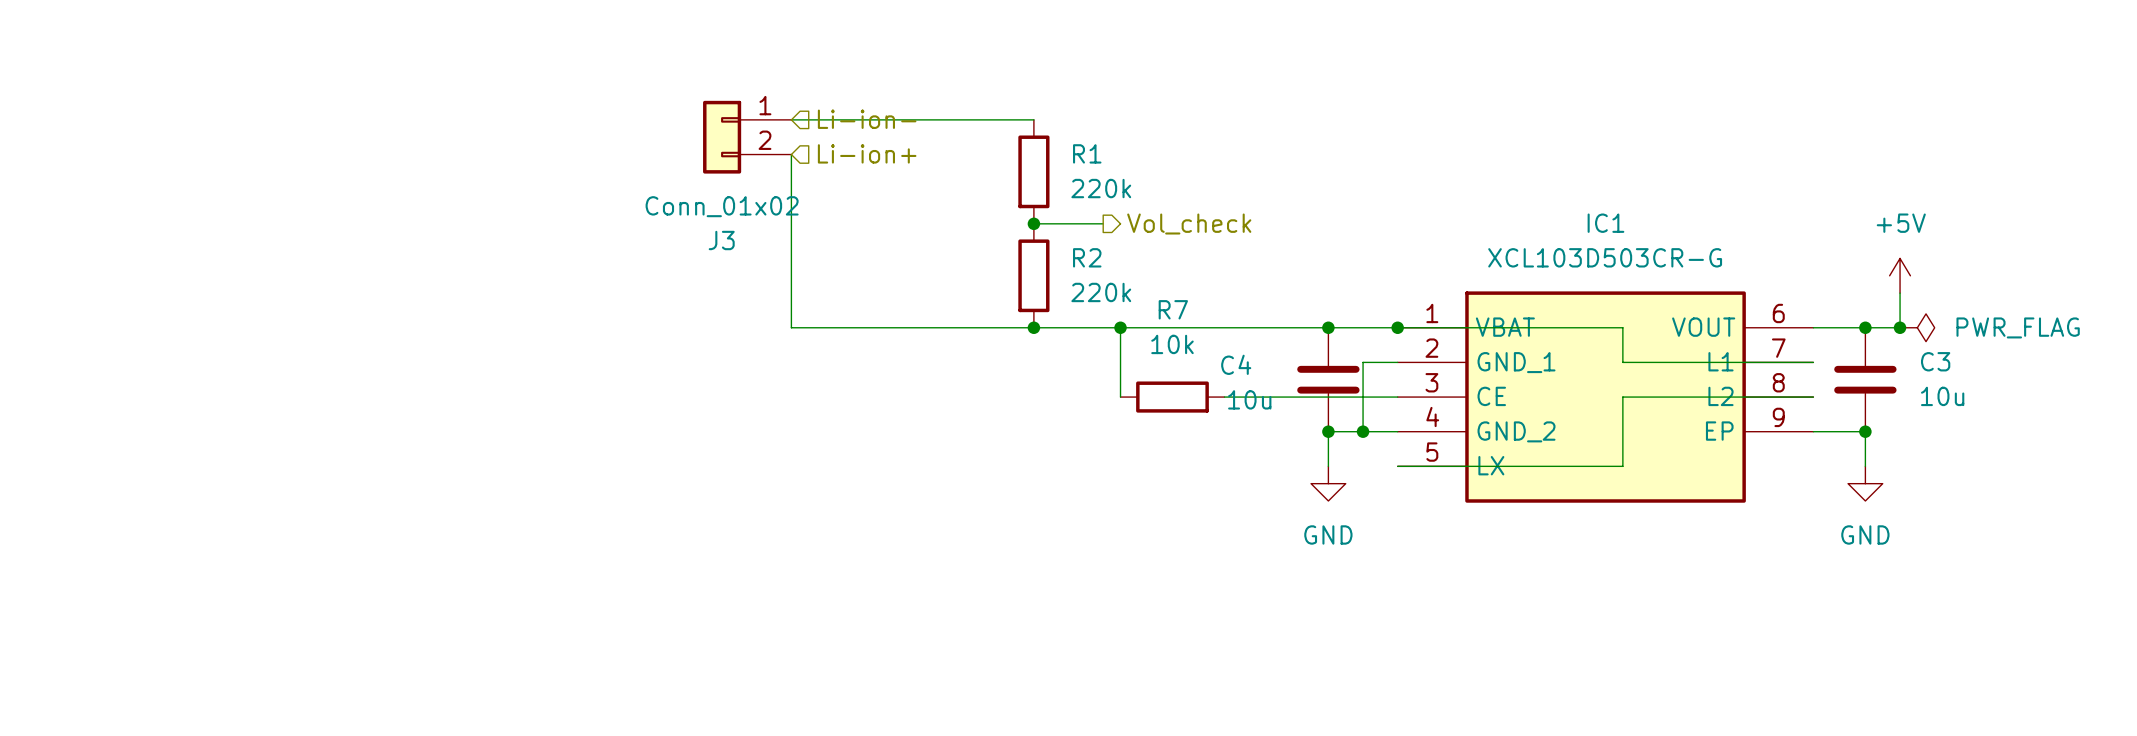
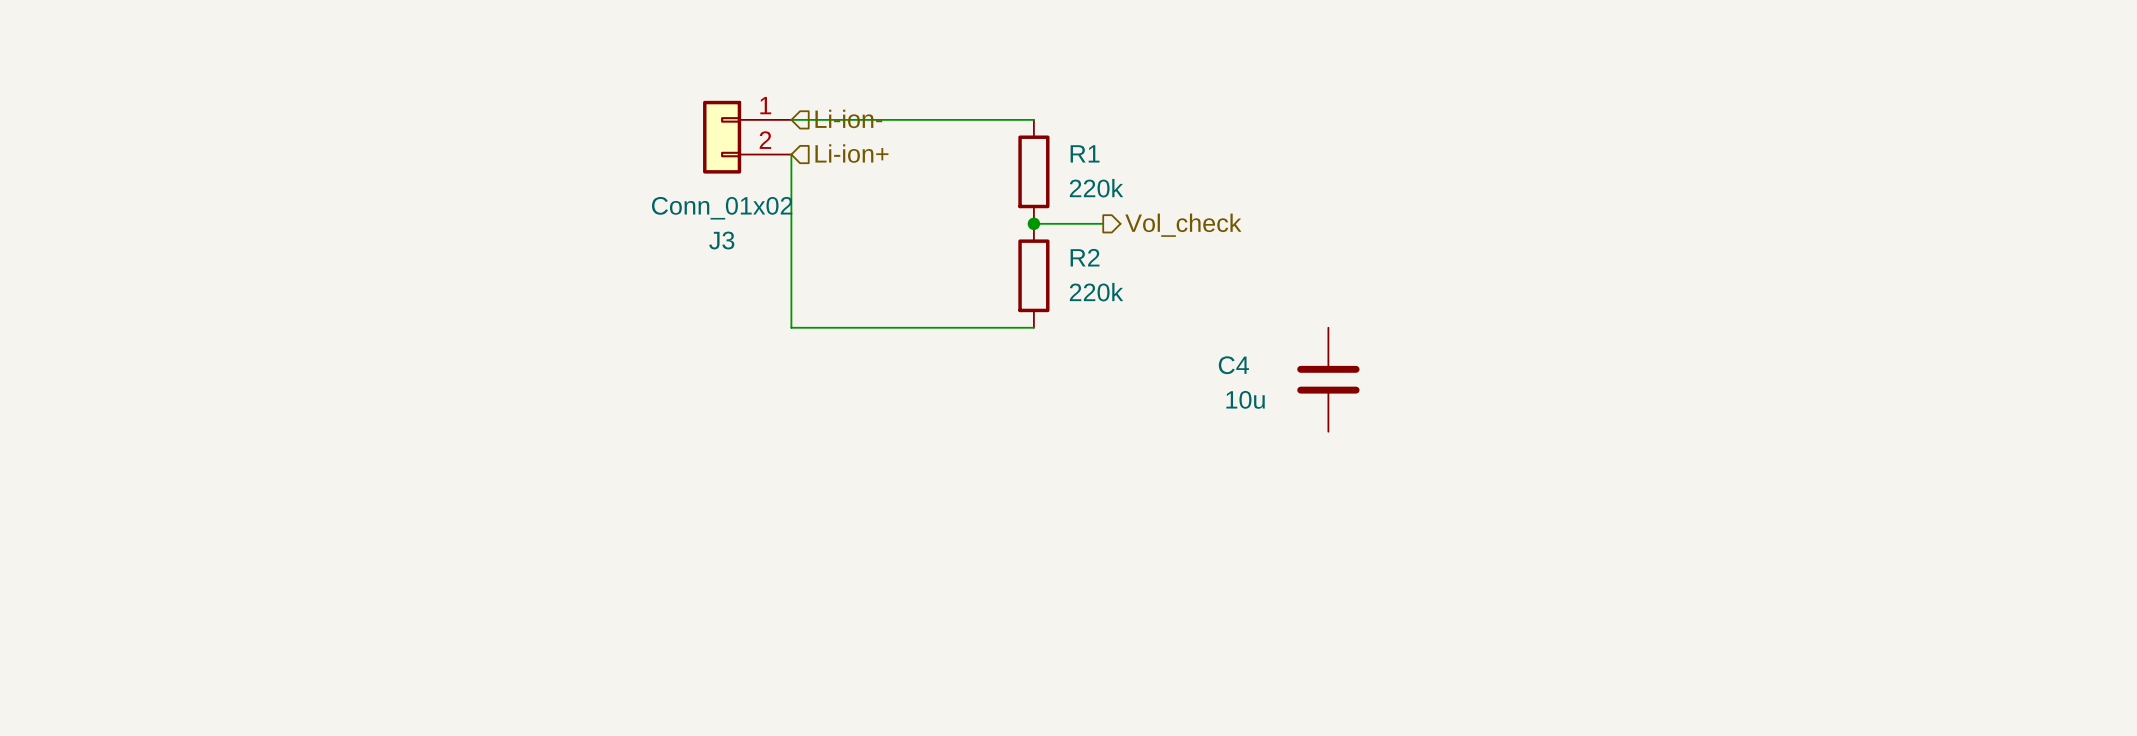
power symbol: +5V (1900, 275) -> none
wire: (1900, 293) (1900, 327) (1813, 327) -> none
wire: (1033, 327) (1622, 327) (1622, 362) (1813, 362) -> none
junction: (1033, 327) -> none
wire: (1120, 327) (1120, 397) -> none
junction: (1120, 327) -> none
junction: (1328, 327) -> none
junction: (1397, 327) -> none
junction: (1865, 327) -> none
junction: (1900, 327) -> none
power symbol: PWR_FLAG (1917, 327) -> none
wire: (1397, 362) (1363, 362) (1363, 431) -> none
C3: 10u (1865, 379) -> none
R7: 10k (1172, 397) -> none
wire: (1224, 397) (1397, 397) -> none
IC1: XCL103D503CR-G (1605, 397) -> none
wire: (1813, 397) (1622, 397) (1622, 466) (1397, 466) -> none
junction: (1328, 431) -> none
junction: (1363, 431) -> none
wire: (1397, 431) (1328, 431) (1328, 466) -> none
wire: (1813, 431) (1865, 431) (1865, 466) -> none
junction: (1865, 431) -> none
power symbol: GND (1328, 483) -> none
power symbol: GND (1865, 483) -> none

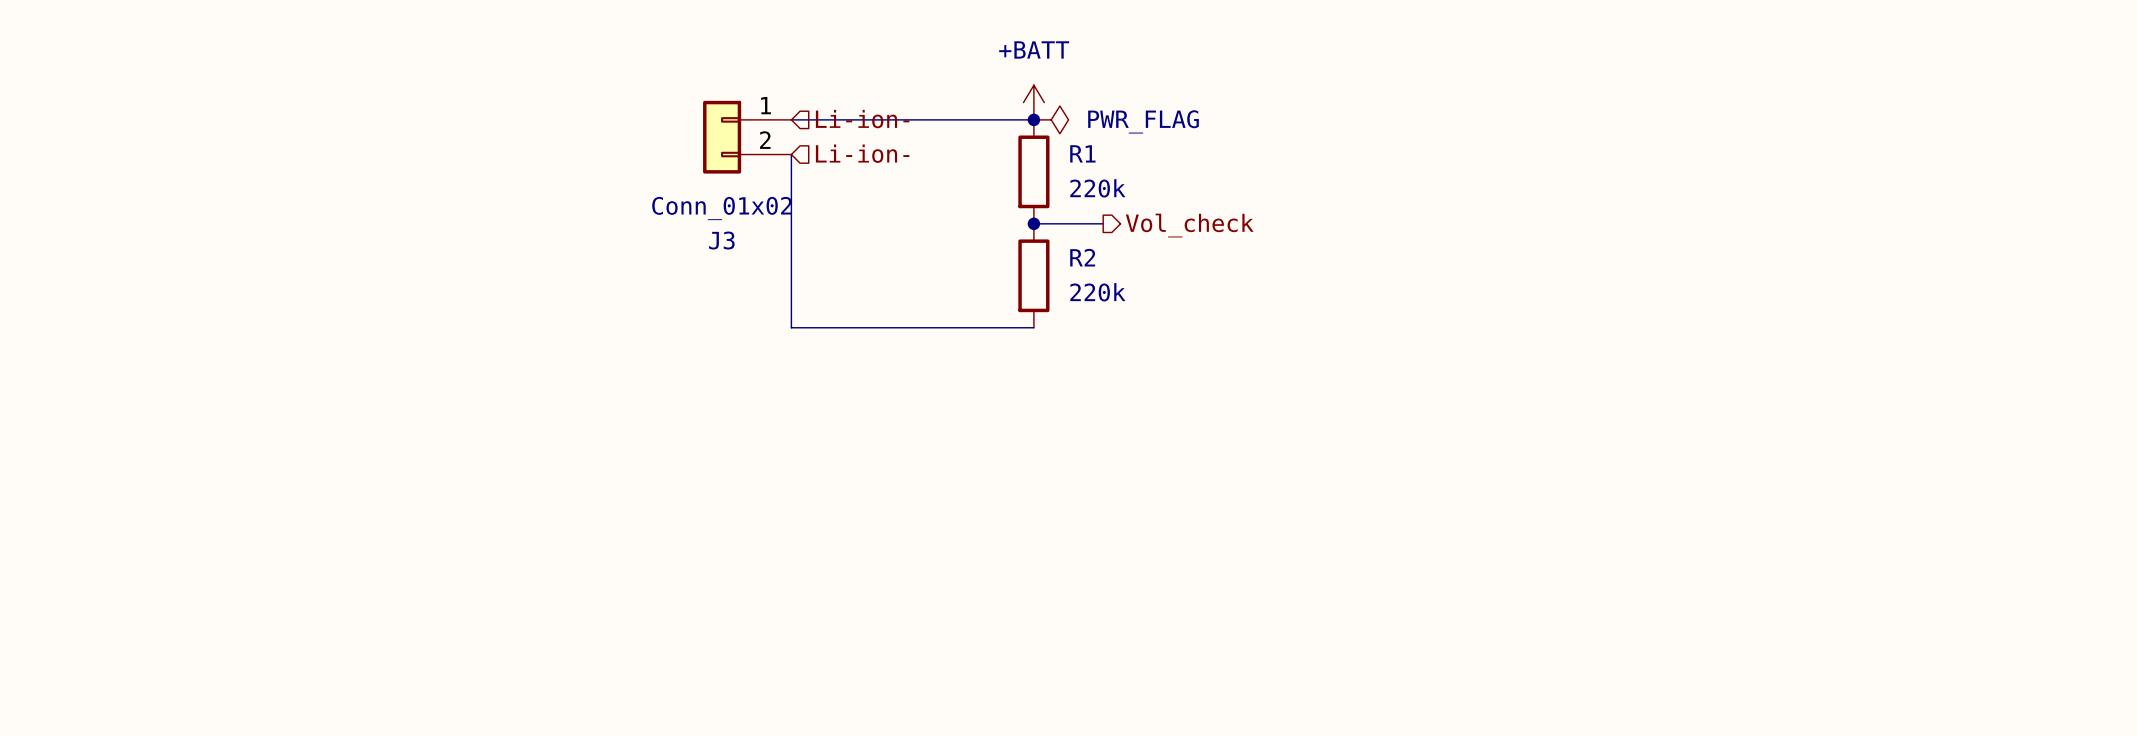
power symbol: none -> +BATT (1033, 102)
junction: none -> (1033, 119)
power symbol: none -> PWR_FLAG (1051, 119)
hierarchical label: Li-ion+ (851, 153) -> Li-ion- (862, 153)
C4: 10u (1328, 379) -> none

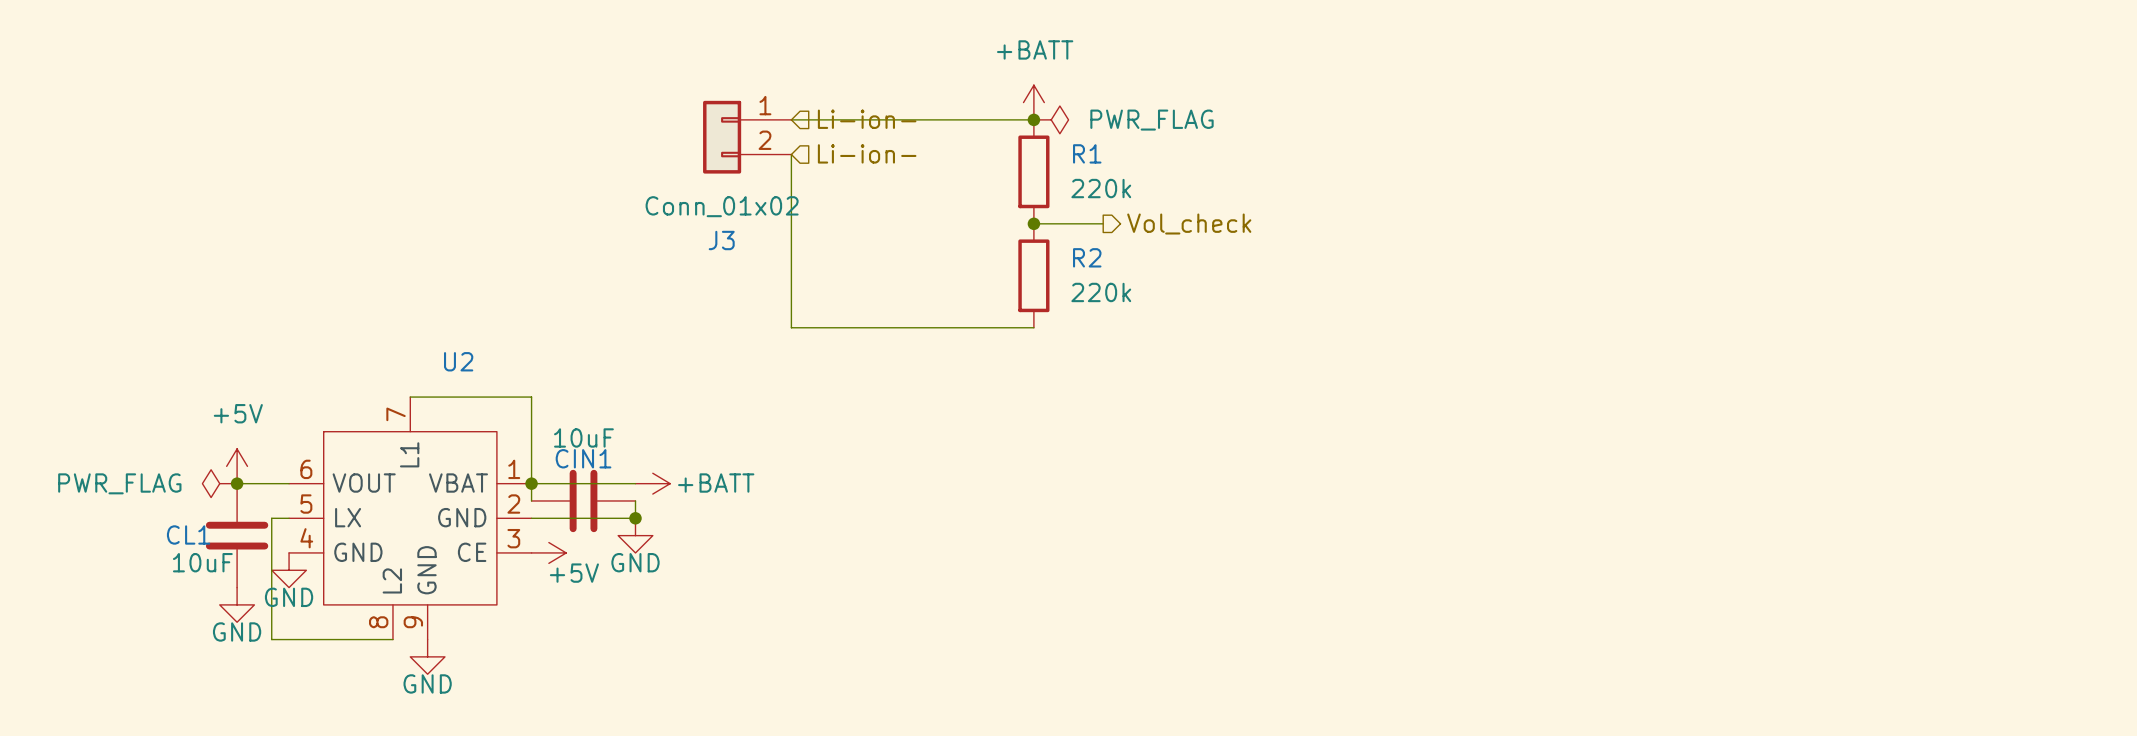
wire: none -> (410, 397) (531, 397) (531, 500)
power symbol: none -> +5V (237, 466)
power symbol: none -> PWR_FLAG (219, 483)
wire: none -> (237, 483) (289, 483)
junction: none -> (237, 483)
wire: none -> (531, 483) (635, 483)
junction: none -> (531, 483)
power symbol: none -> +BATT (652, 483)
CIN1: none -> 10uF (583, 500)
wire: none -> (635, 500) (635, 518) (531, 518)
wire: none -> (289, 518) (271, 518) (271, 639) (392, 639)
U2: none -> (410, 518)
junction: none -> (635, 518)
CL1: none -> 10uF (237, 535)
power symbol: none -> GND (635, 535)
power symbol: none -> +5V (548, 552)
power symbol: none -> GND (289, 570)
power symbol: none -> GND (237, 604)
power symbol: none -> GND (427, 656)

